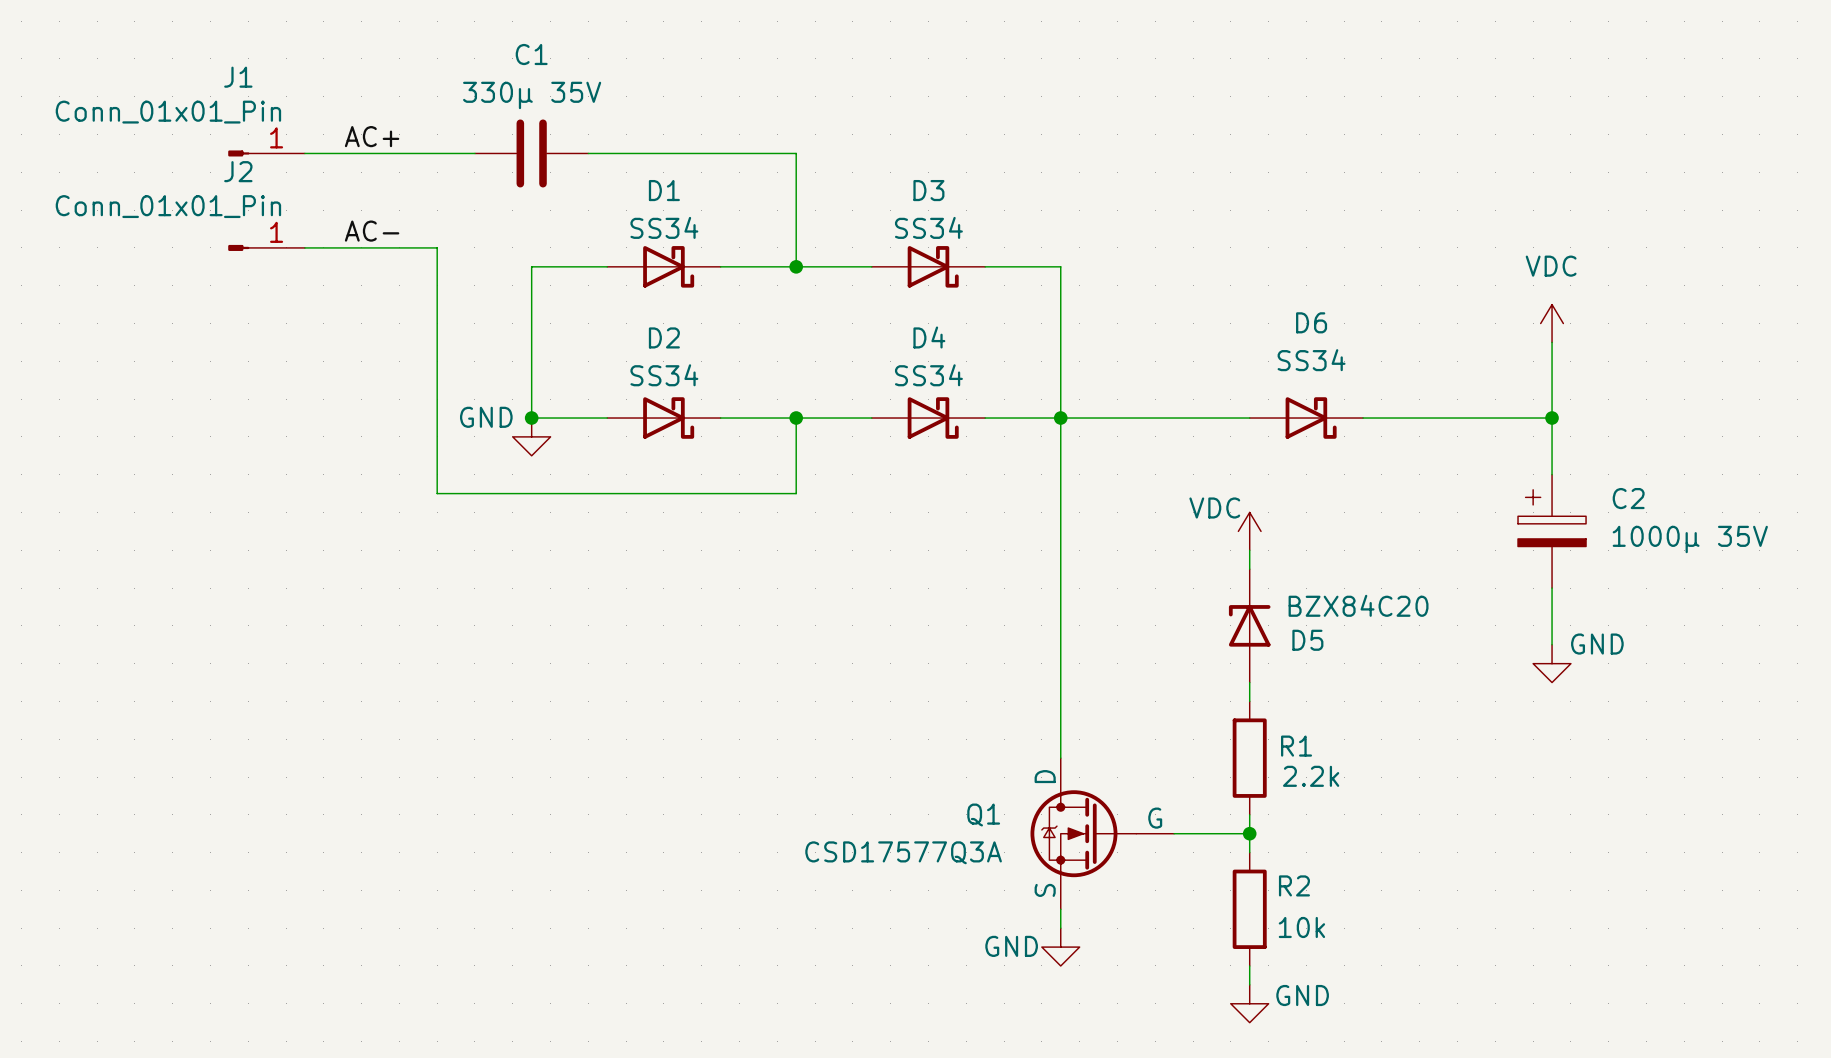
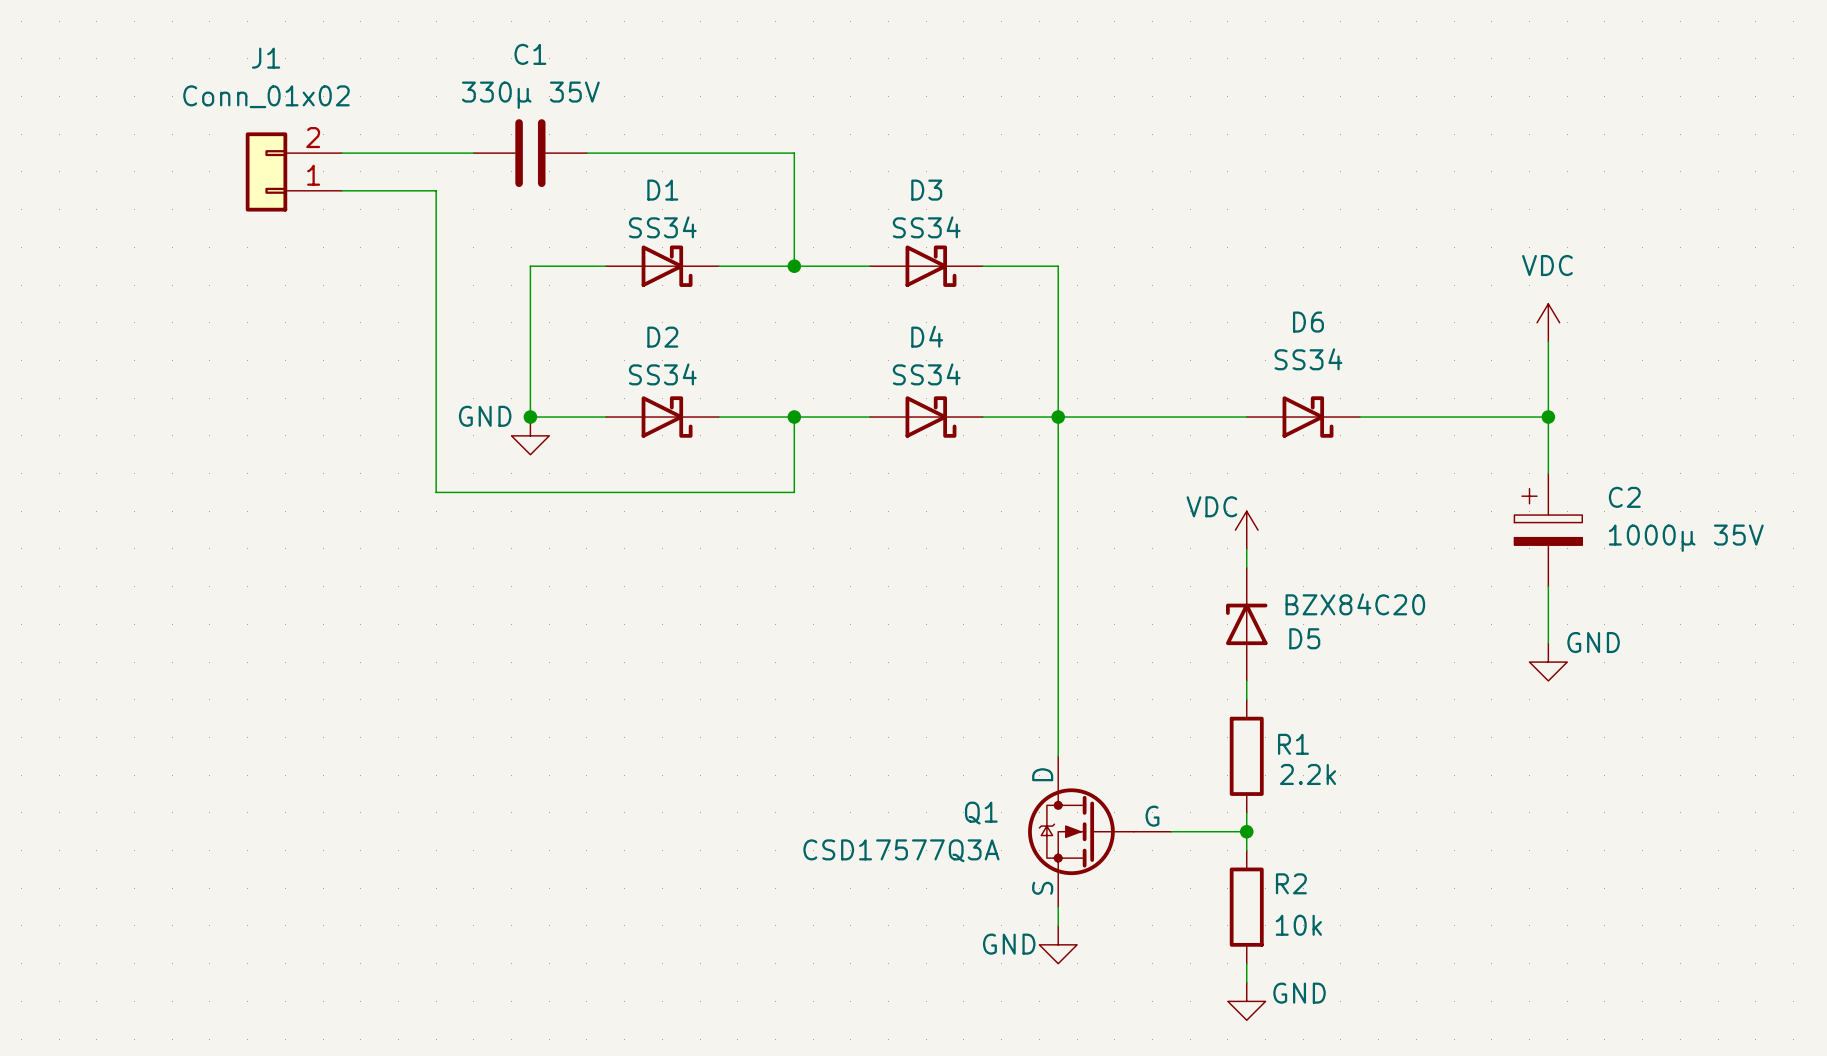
J1 name position: J1 (238, 77) -> J1 (266, 58)
J1 value: Conn_01x01_Pin (168, 112) -> Conn_01x02 (266, 96)
label: AC+ (372, 136) -> none
J1 symbol: [228, 150, 305, 157] -> [245, 132, 342, 212]
label: AC- (372, 231) -> none
J2: Conn_01x01_Pin (266, 247) -> none
wire: (304, 247) (437, 247) -> (341, 190) (436, 190) (436, 247)

